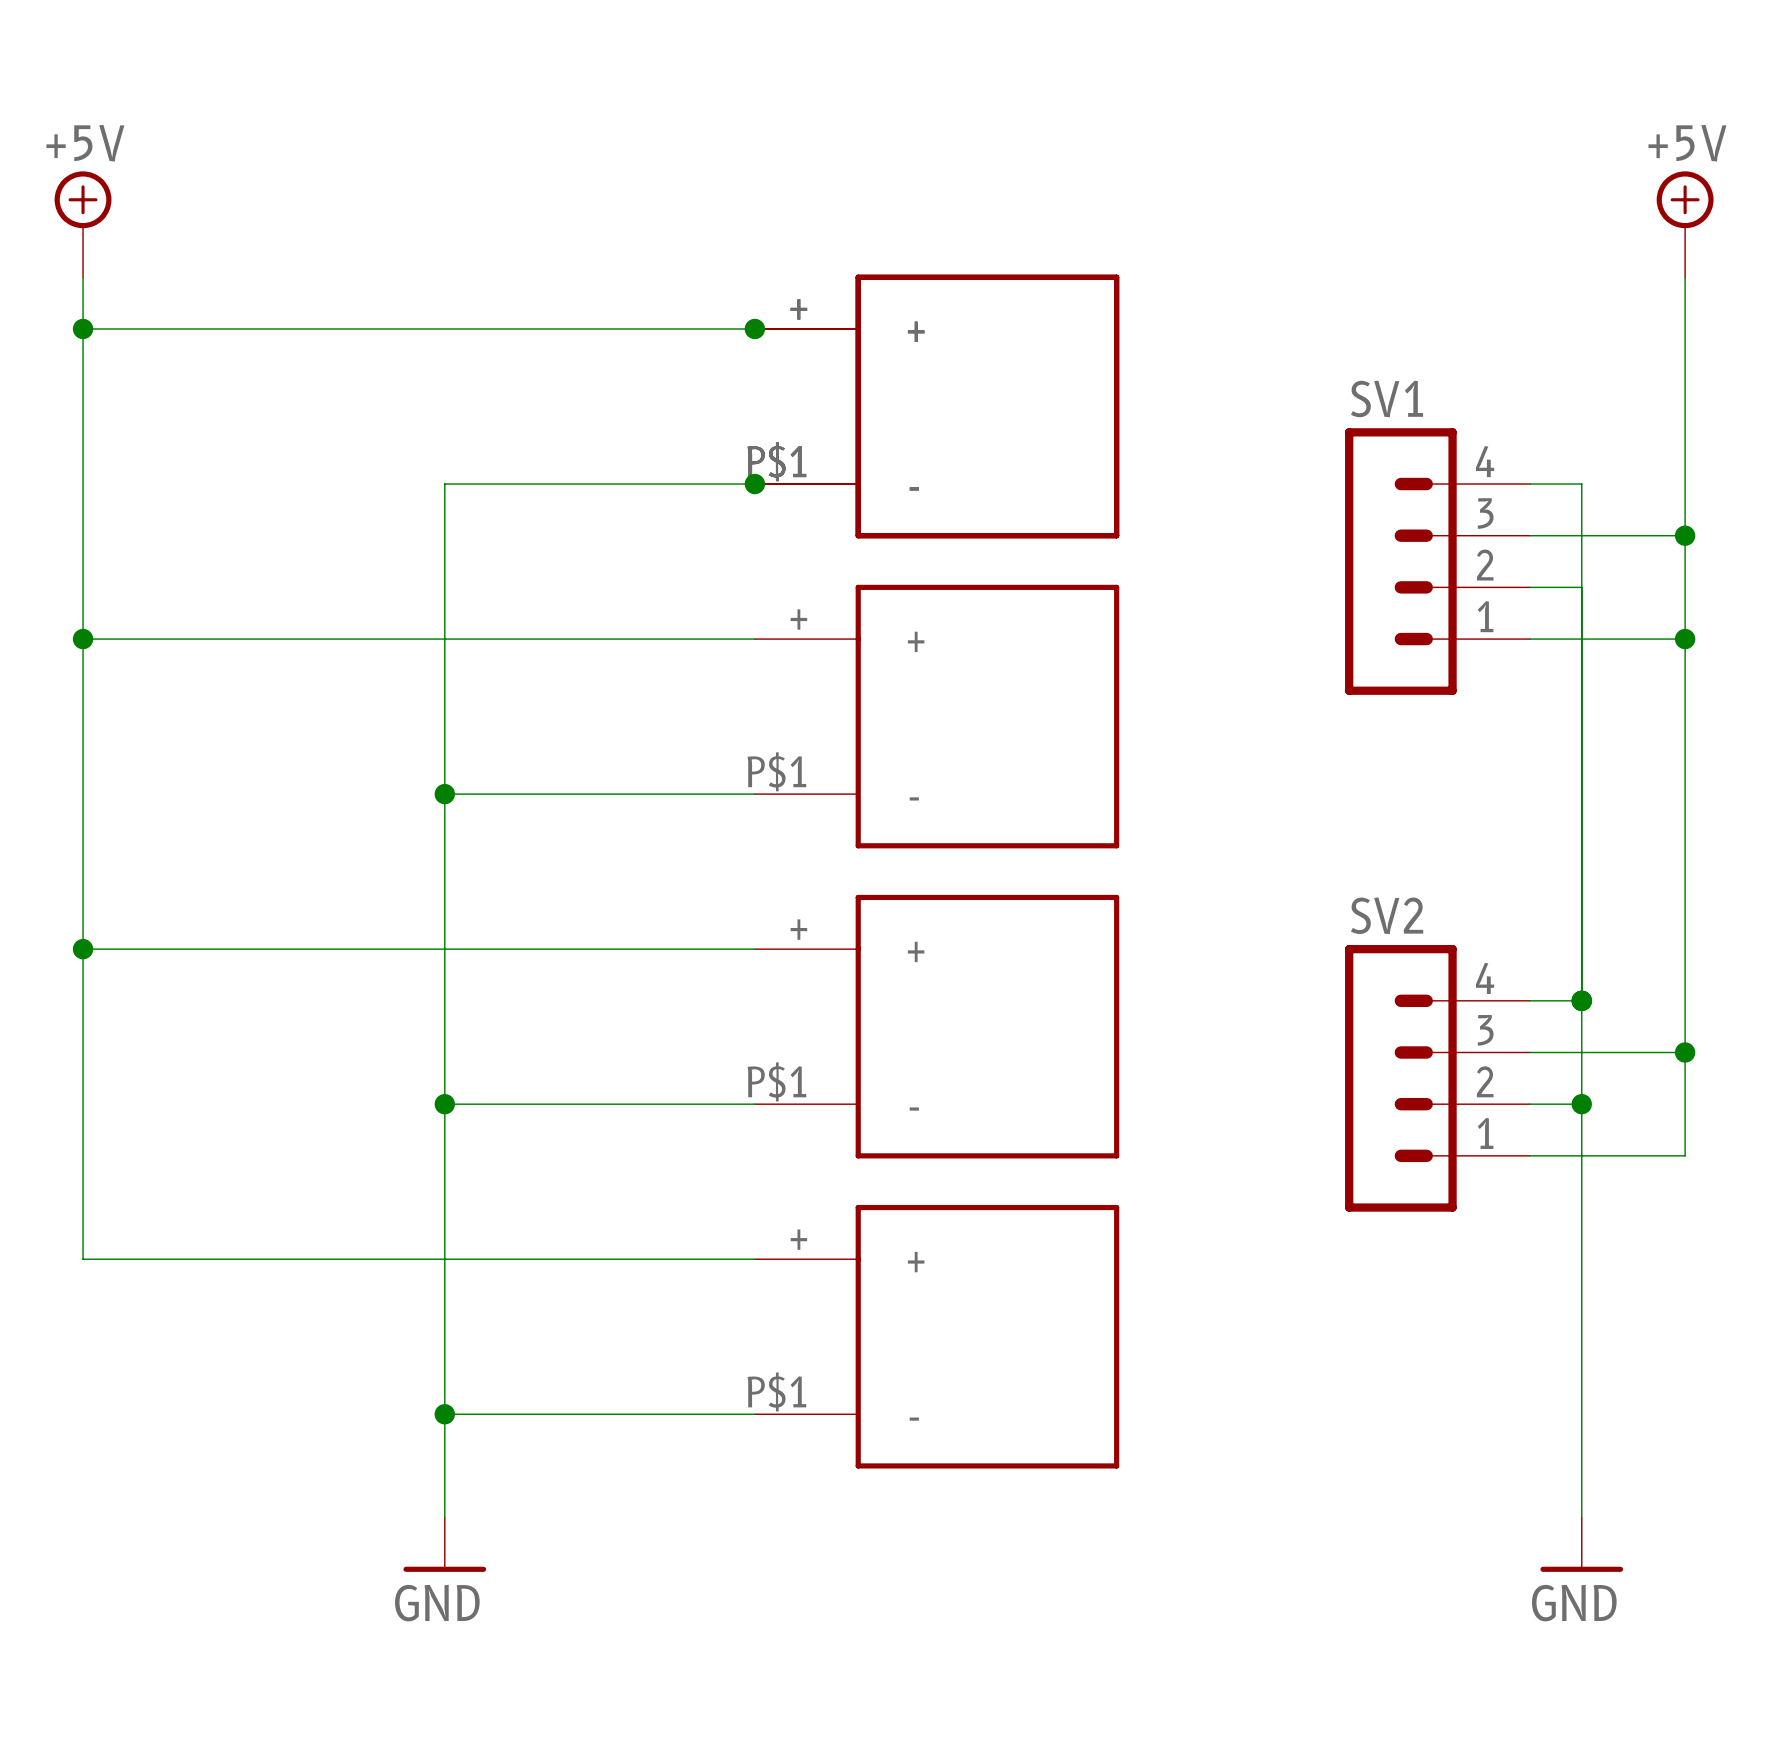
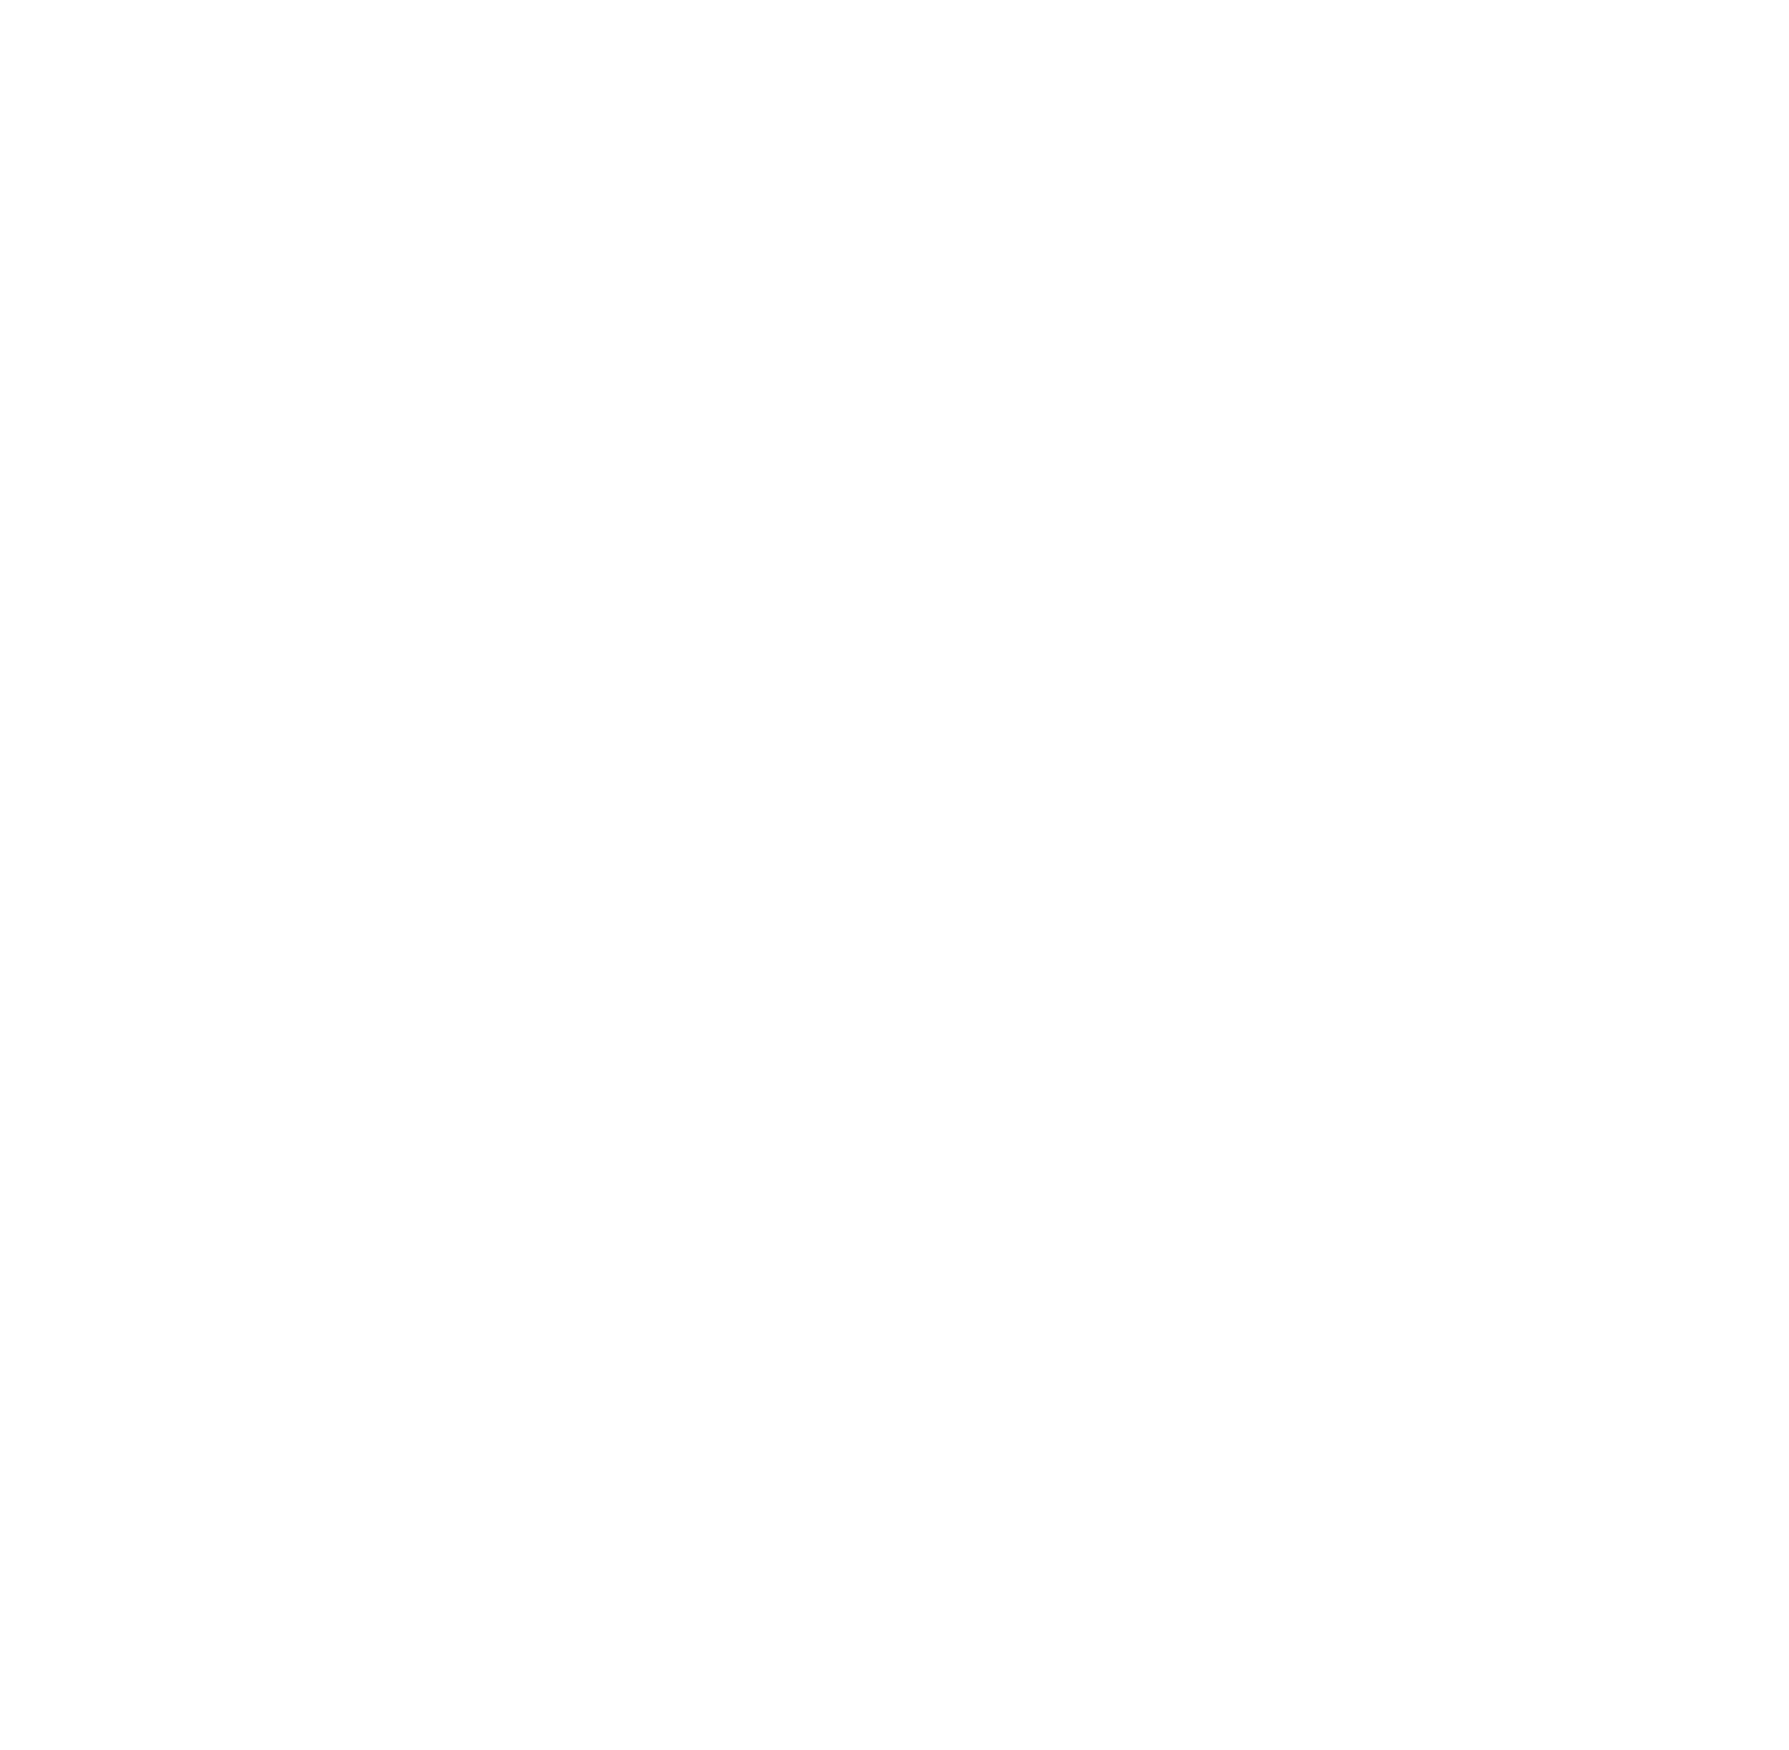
power symbol: +5V (83, 224) -> none
power symbol: +5V (1685, 224) -> none
wire: (83, 277) (83, 1259) (754, 1259) -> none
wire: (1685, 277) (1685, 1155) (1530, 1155) -> none
wire: (83, 328) (754, 328) -> none
junction: (83, 328) -> none
junction: (754, 328) -> none
part: (937, 406) -> none
wire: (754, 484) (444, 484) (444, 1517) -> none
junction: (754, 484) -> none
wire: (1530, 484) (1581, 484) (1581, 1517) -> none
wire: (1530, 535) (1685, 535) -> none
junction: (1685, 535) -> none
SV1: (1437, 561) -> none
wire: (1530, 587) (1581, 587) -> none
wire: (83, 639) (754, 639) -> none
junction: (83, 639) -> none
wire: (1530, 639) (1685, 639) -> none
junction: (1685, 639) -> none
part: (937, 716) -> none
wire: (444, 794) (754, 794) -> none
junction: (444, 794) -> none
wire: (83, 949) (754, 949) -> none
junction: (83, 949) -> none
wire: (1530, 1000) (1581, 1000) -> none
junction: (1581, 1000) -> none
part: (937, 1026) -> none
wire: (1530, 1052) (1685, 1052) -> none
junction: (1685, 1052) -> none
SV2: (1437, 1078) -> none
wire: (444, 1104) (754, 1104) -> none
junction: (444, 1104) -> none
wire: (1530, 1104) (1581, 1104) -> none
junction: (1581, 1104) -> none
part: (937, 1336) -> none
wire: (444, 1414) (754, 1414) -> none
junction: (444, 1414) -> none
power symbol: GND (444, 1544) -> none
power symbol: GND (1581, 1544) -> none

